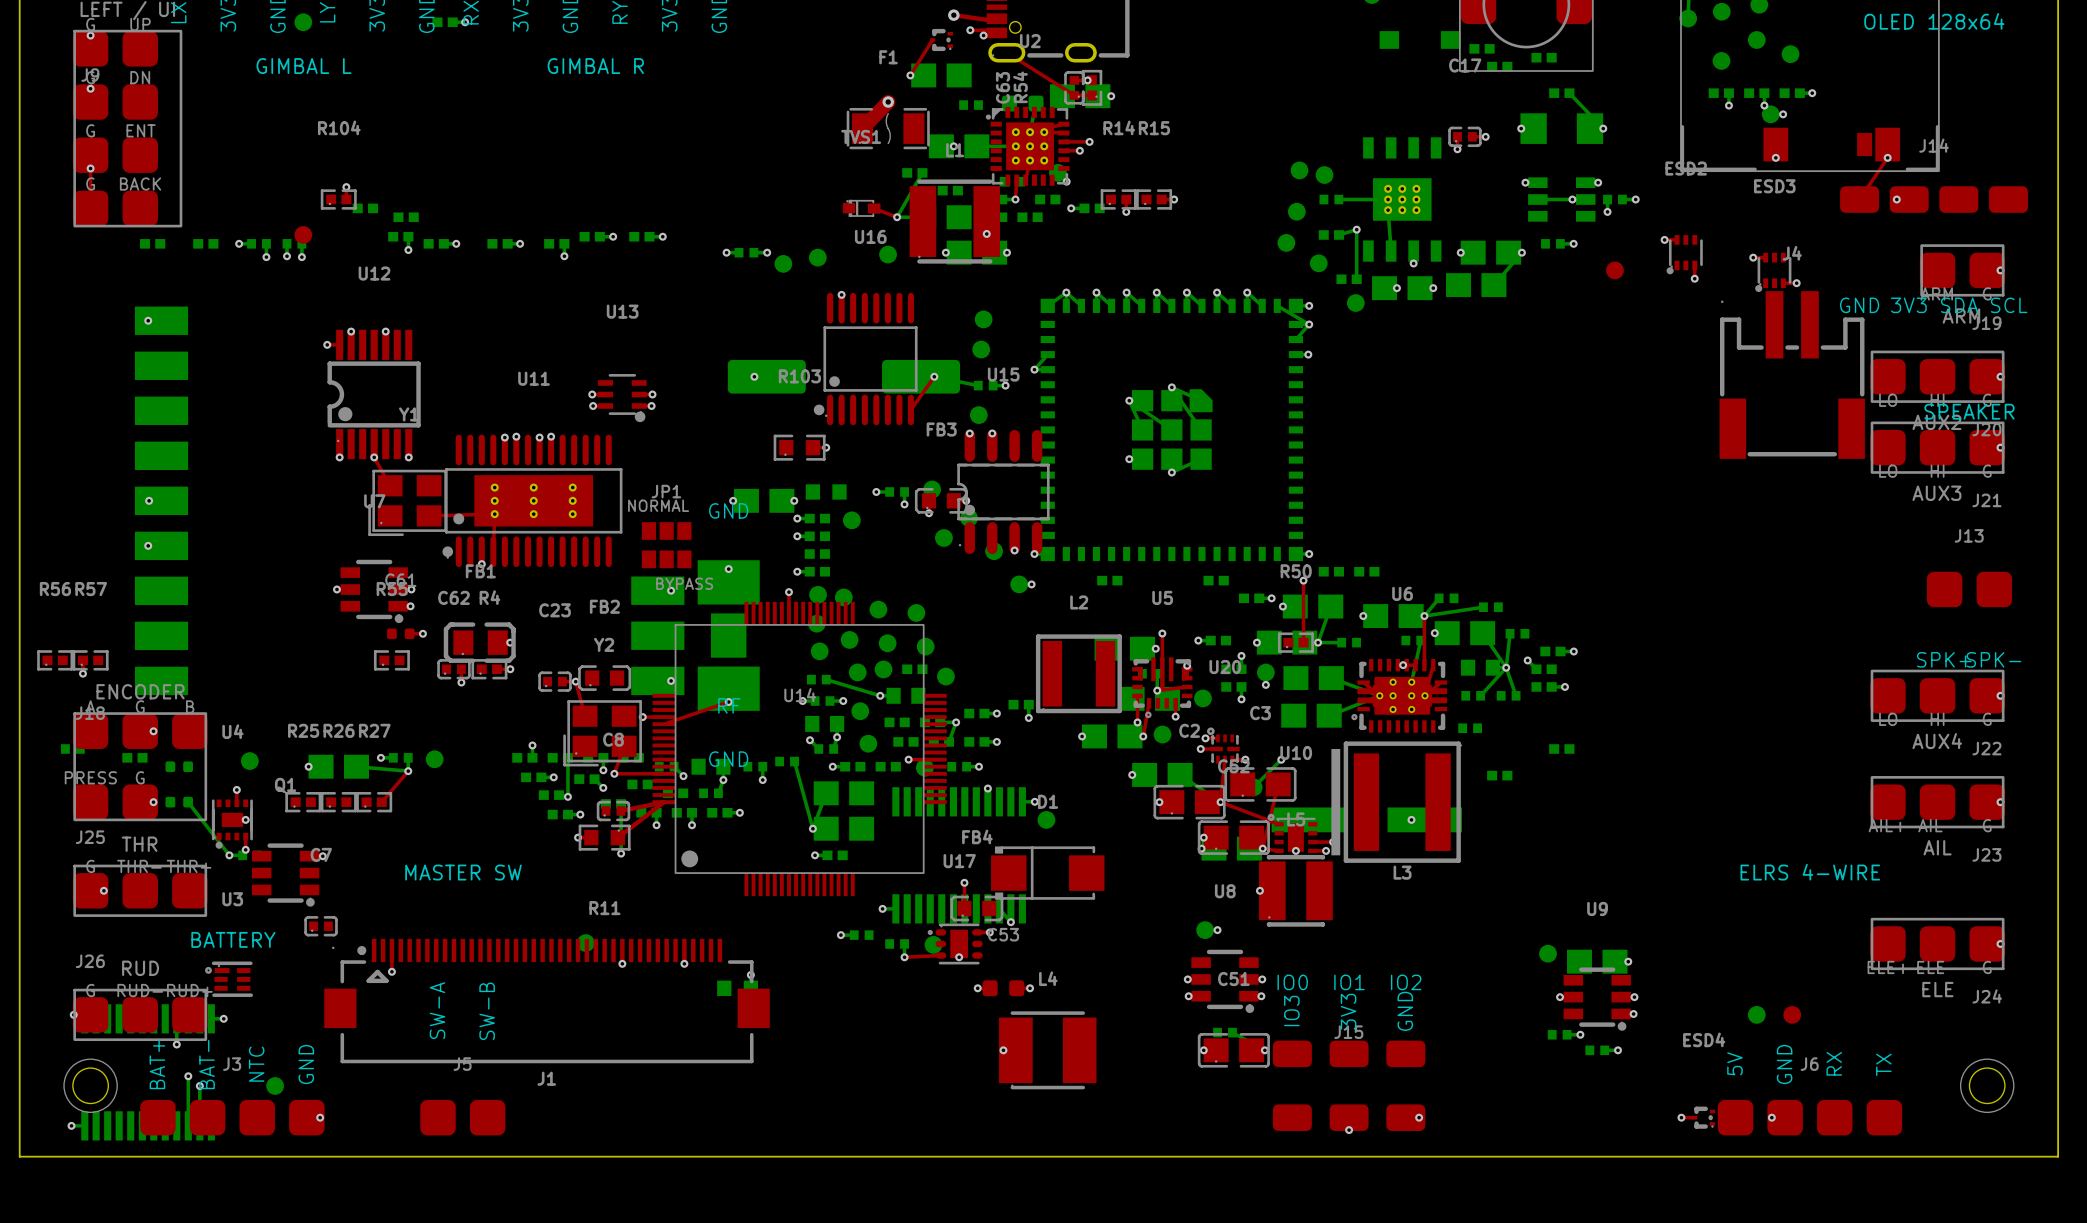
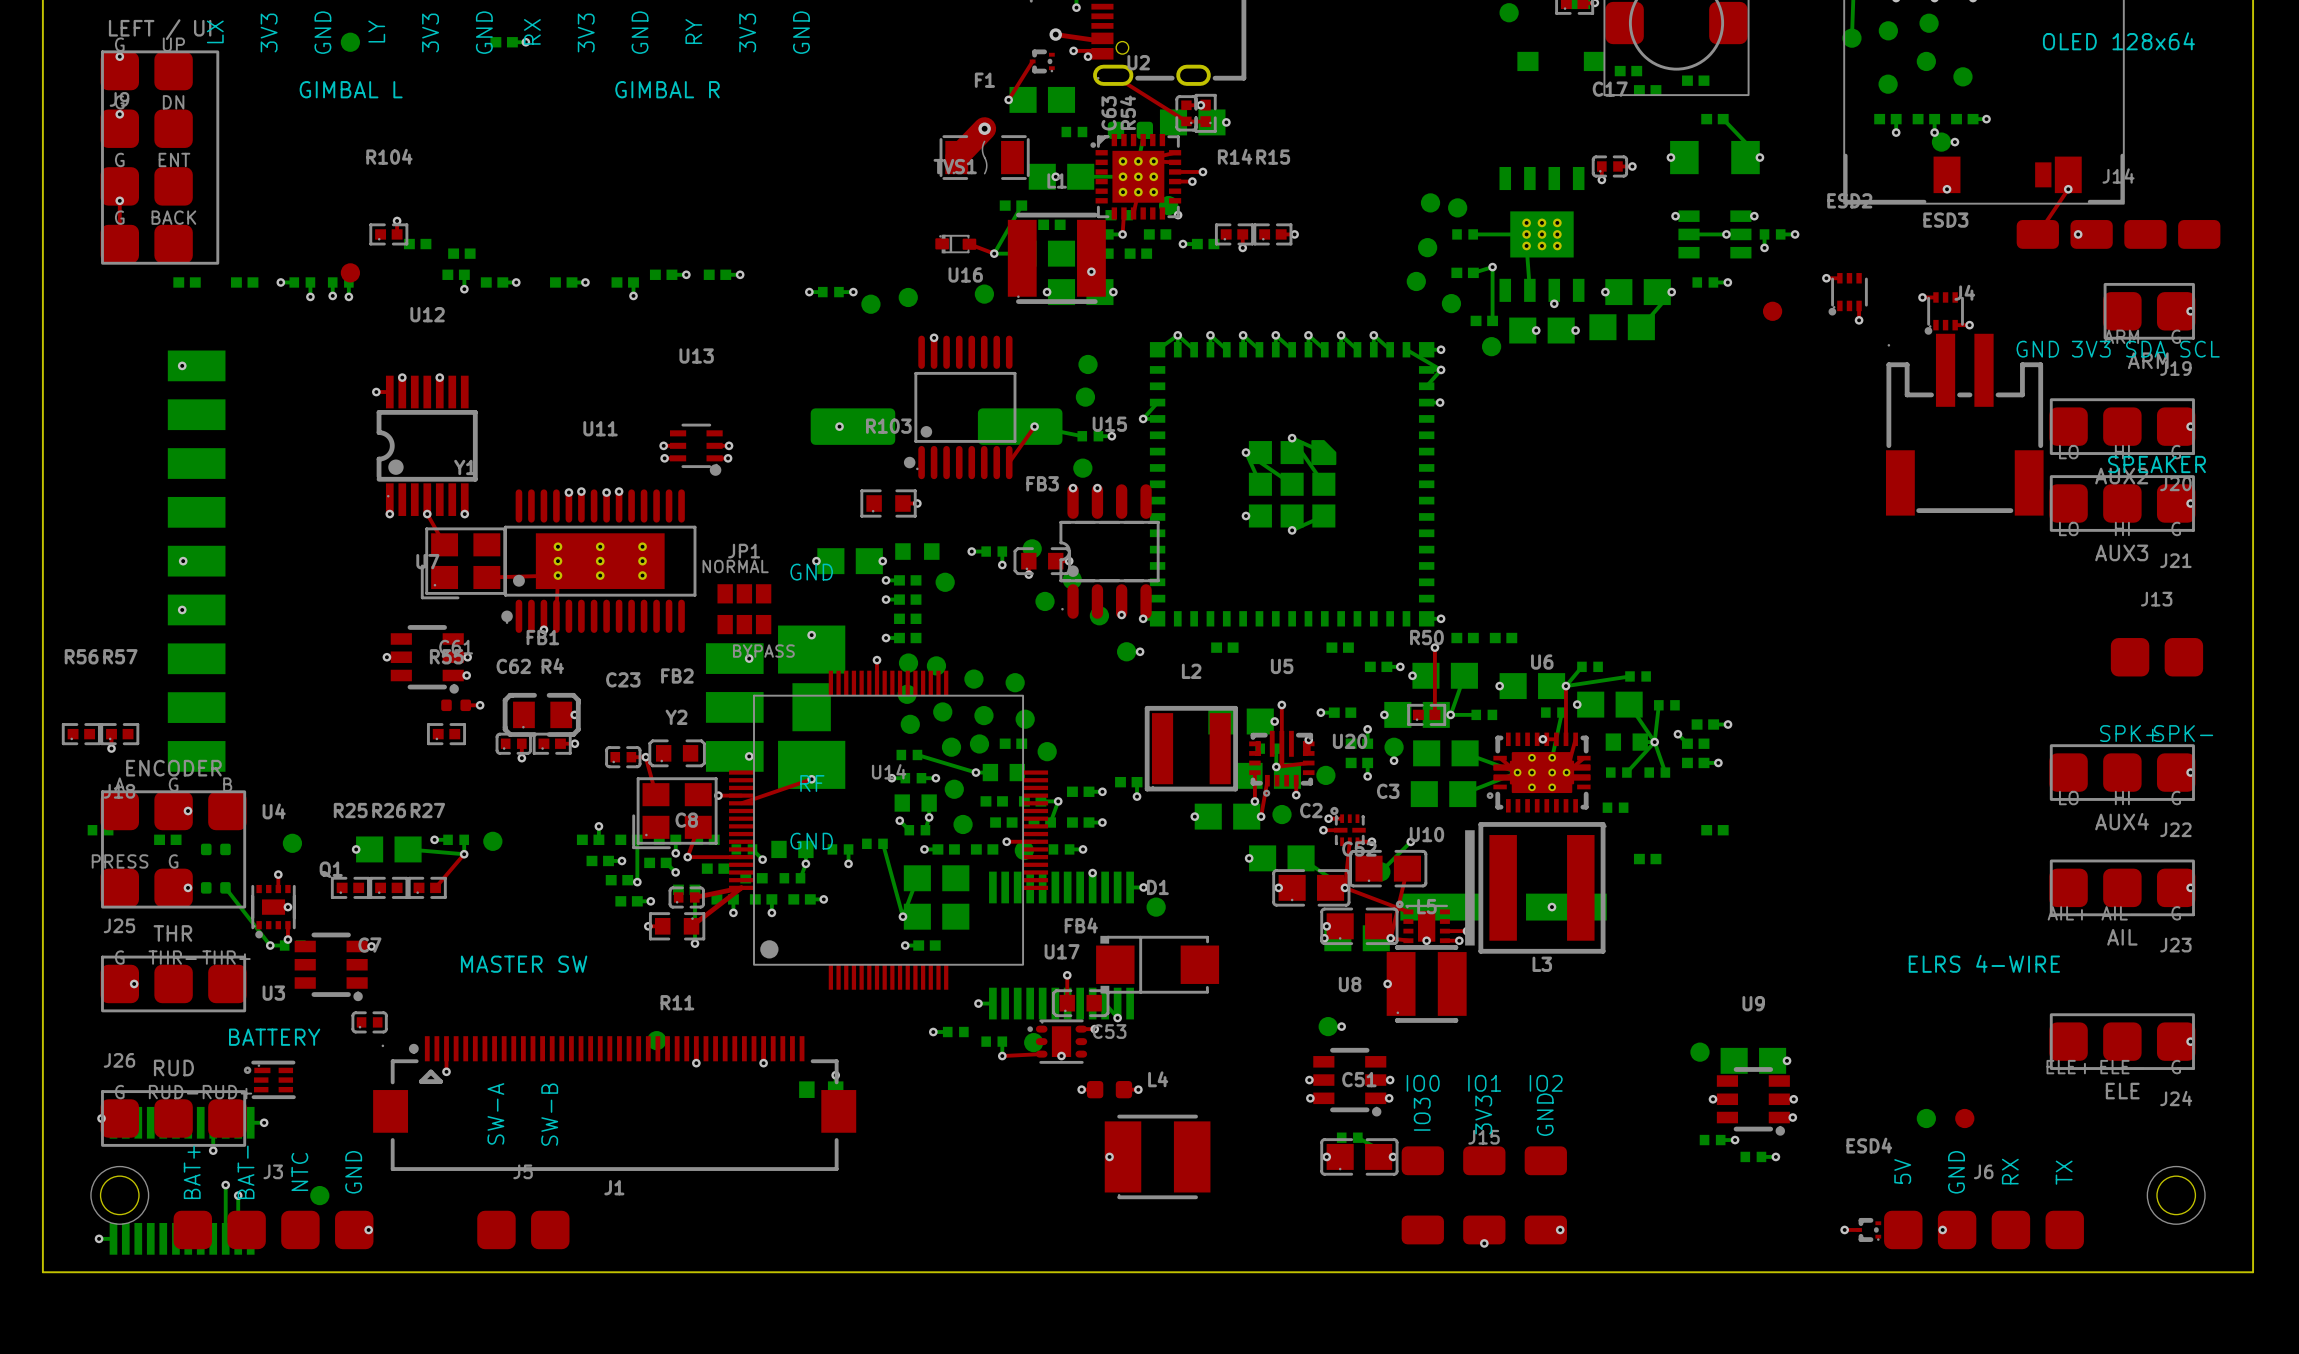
top track width: thin (888, 102) (862, 128) -> thick (984, 128) (956, 157)

